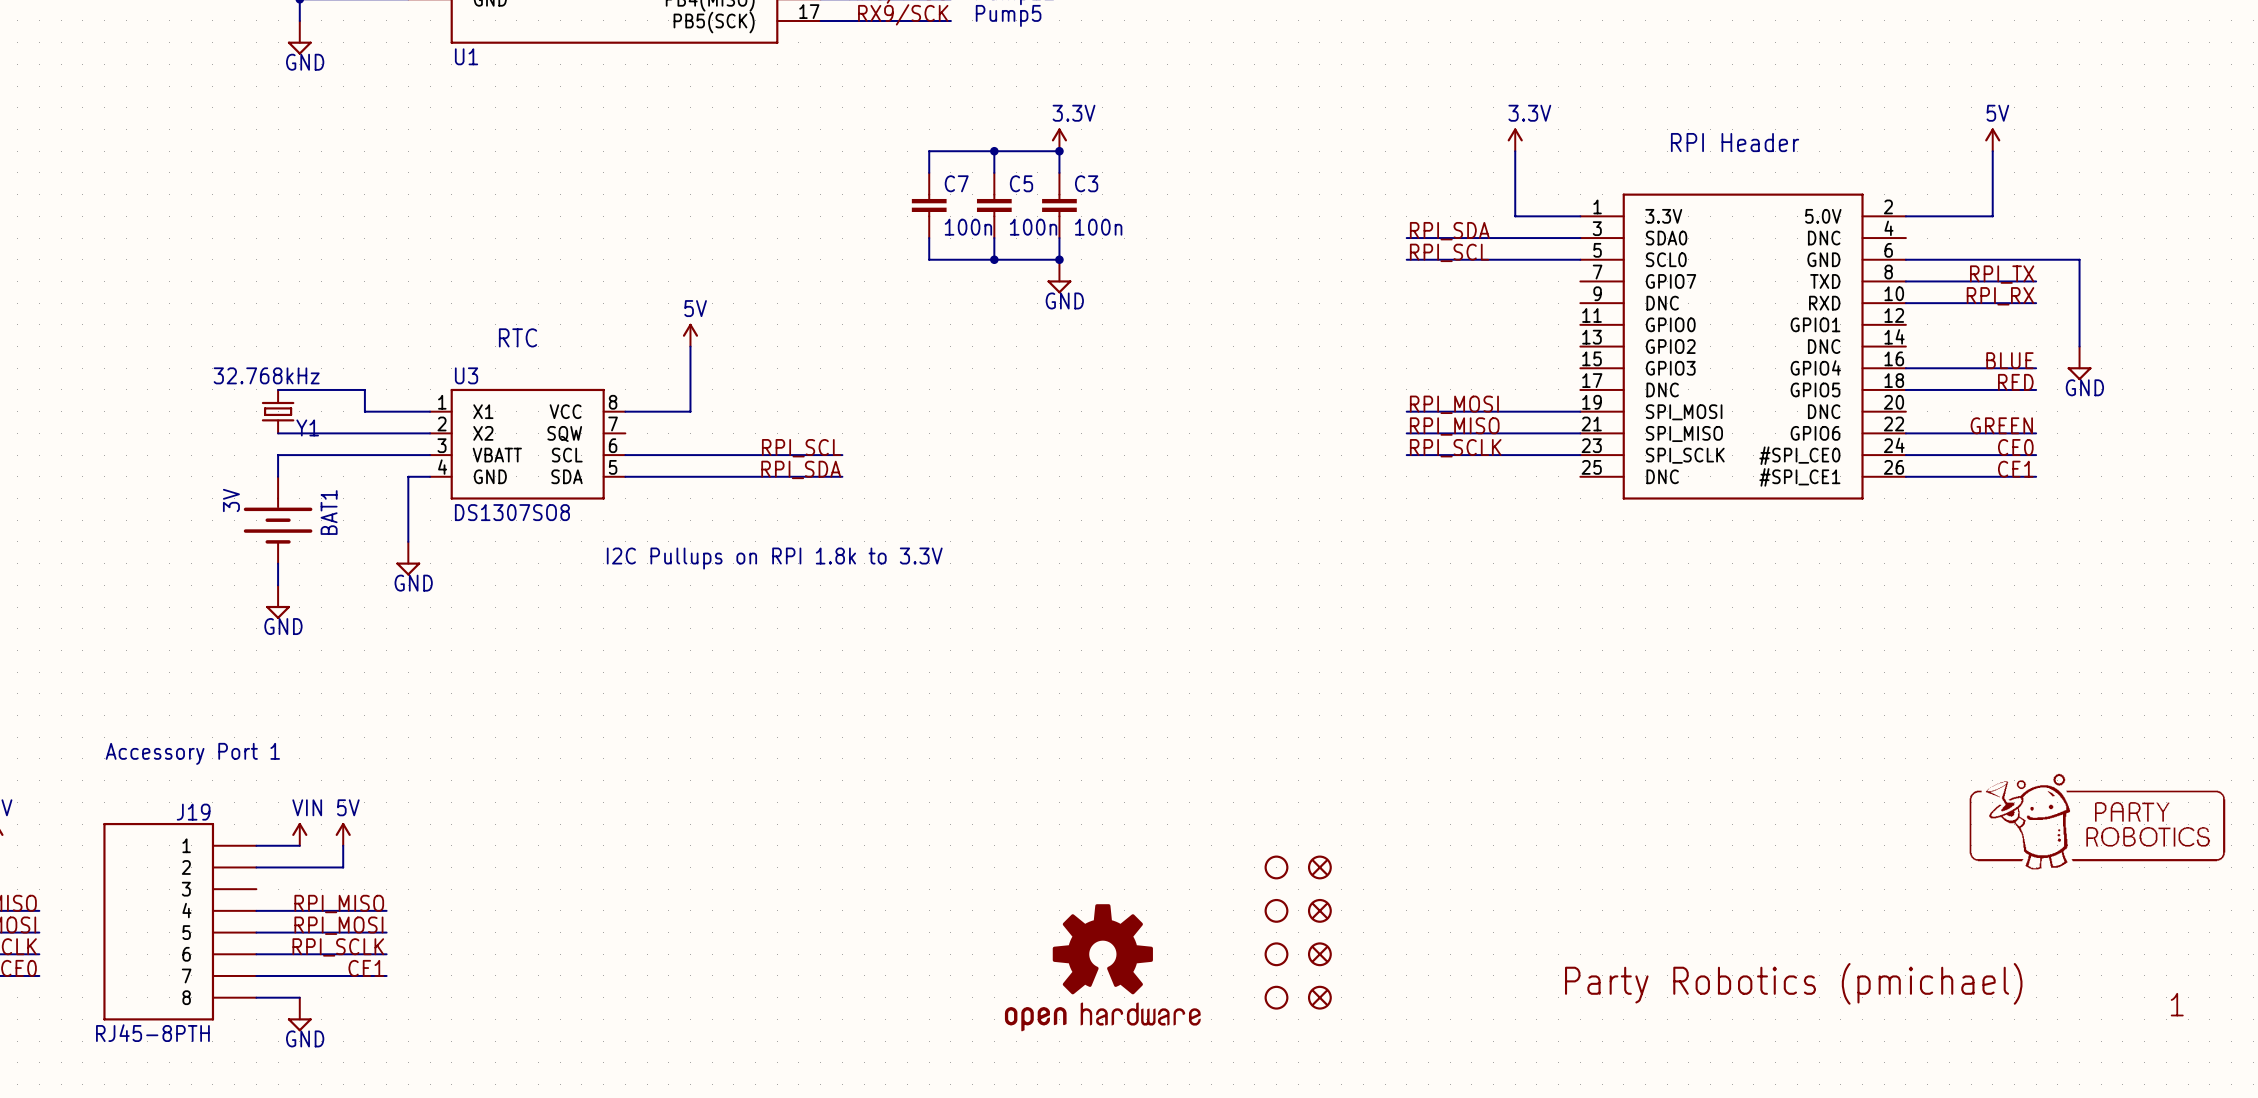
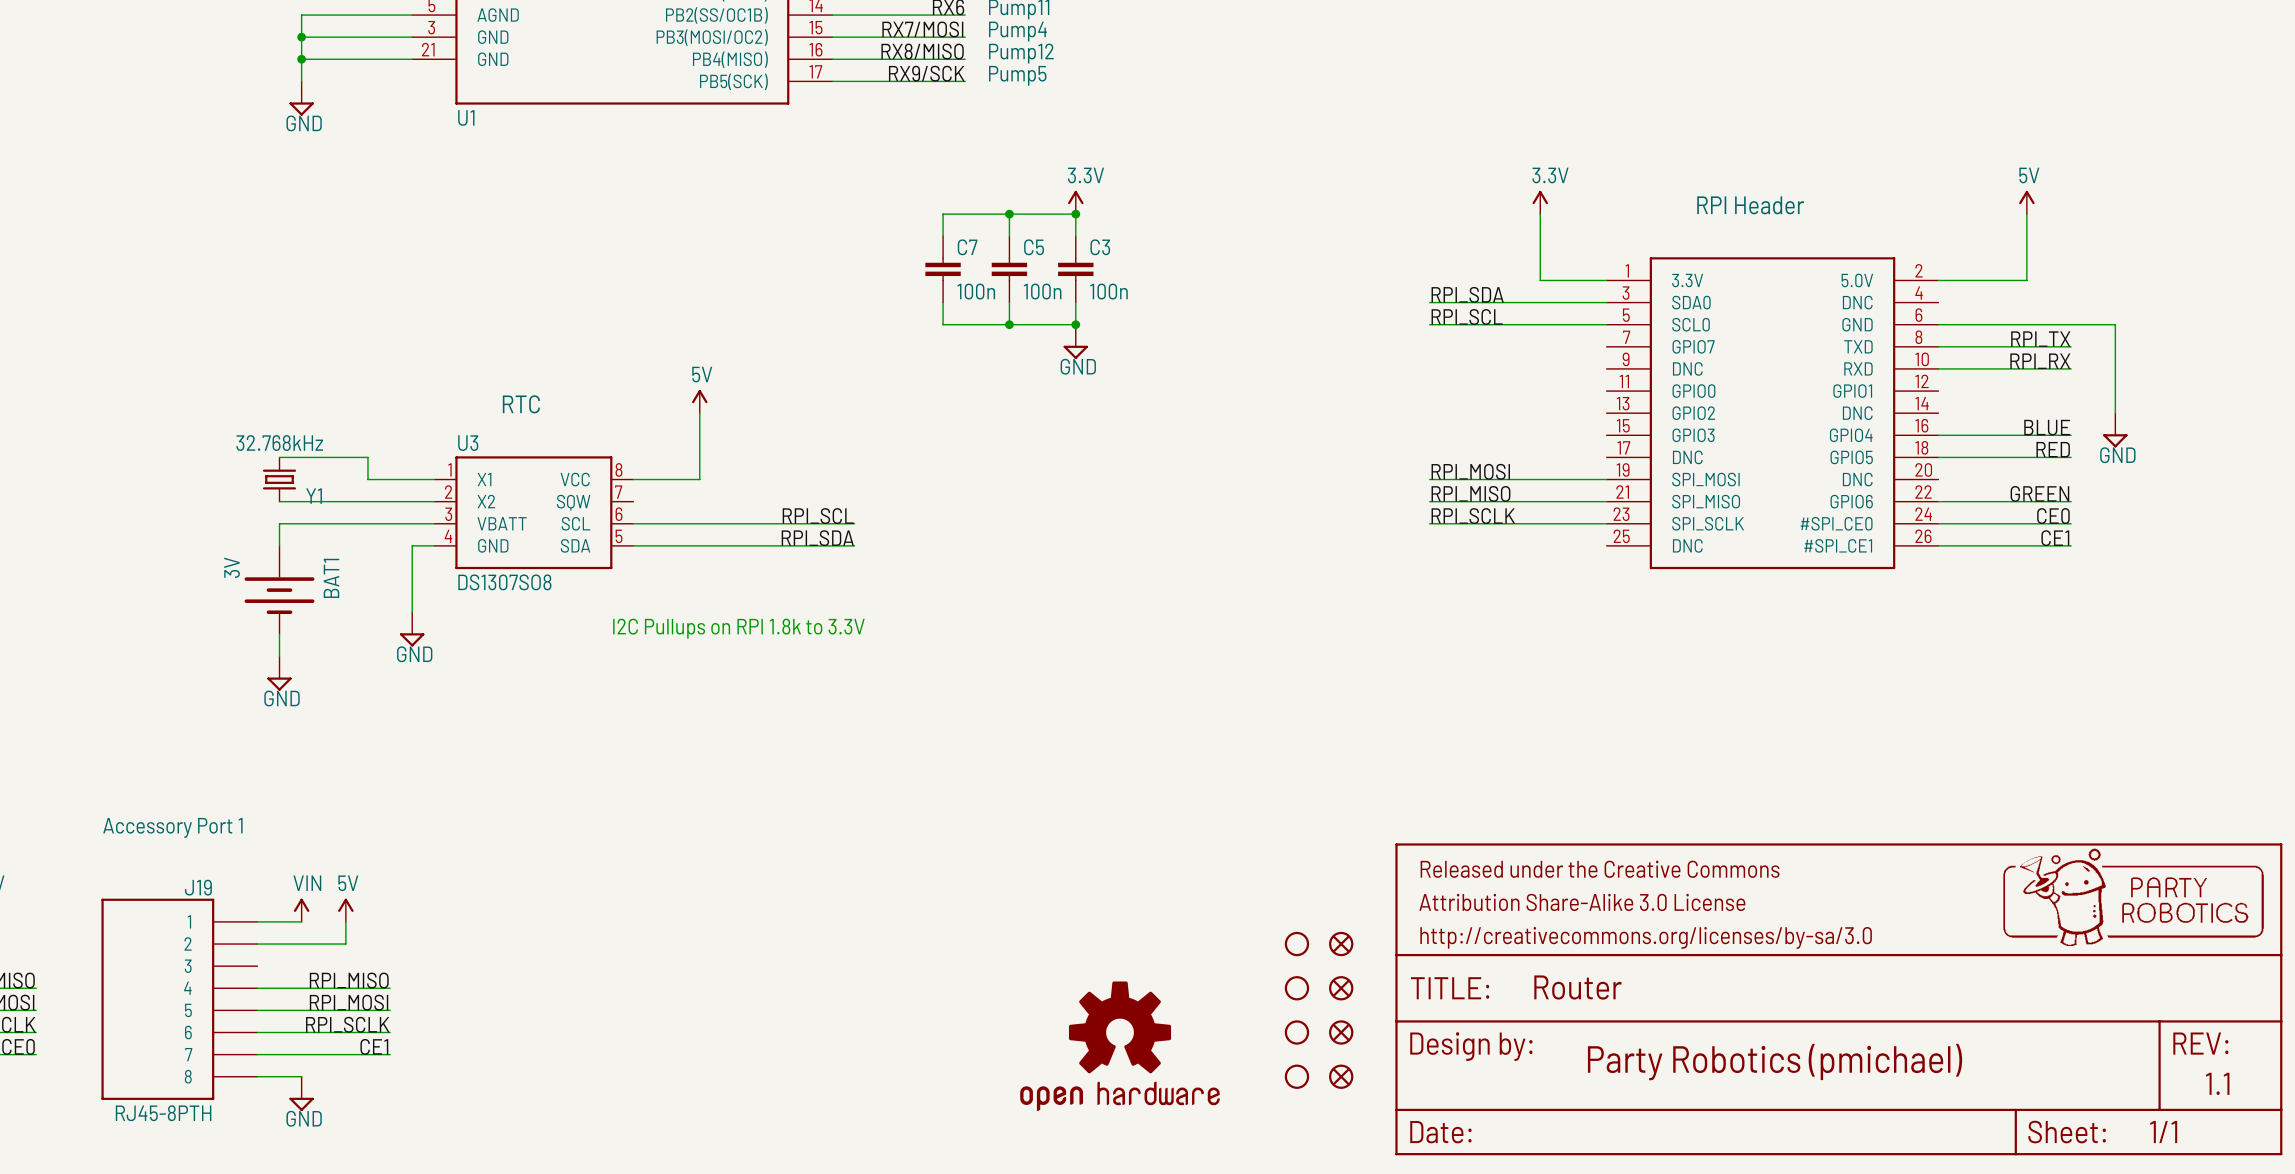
part: none -> (1838, 999)
text: 1 (2177, 1004) -> 1.1 (2217, 1083)

